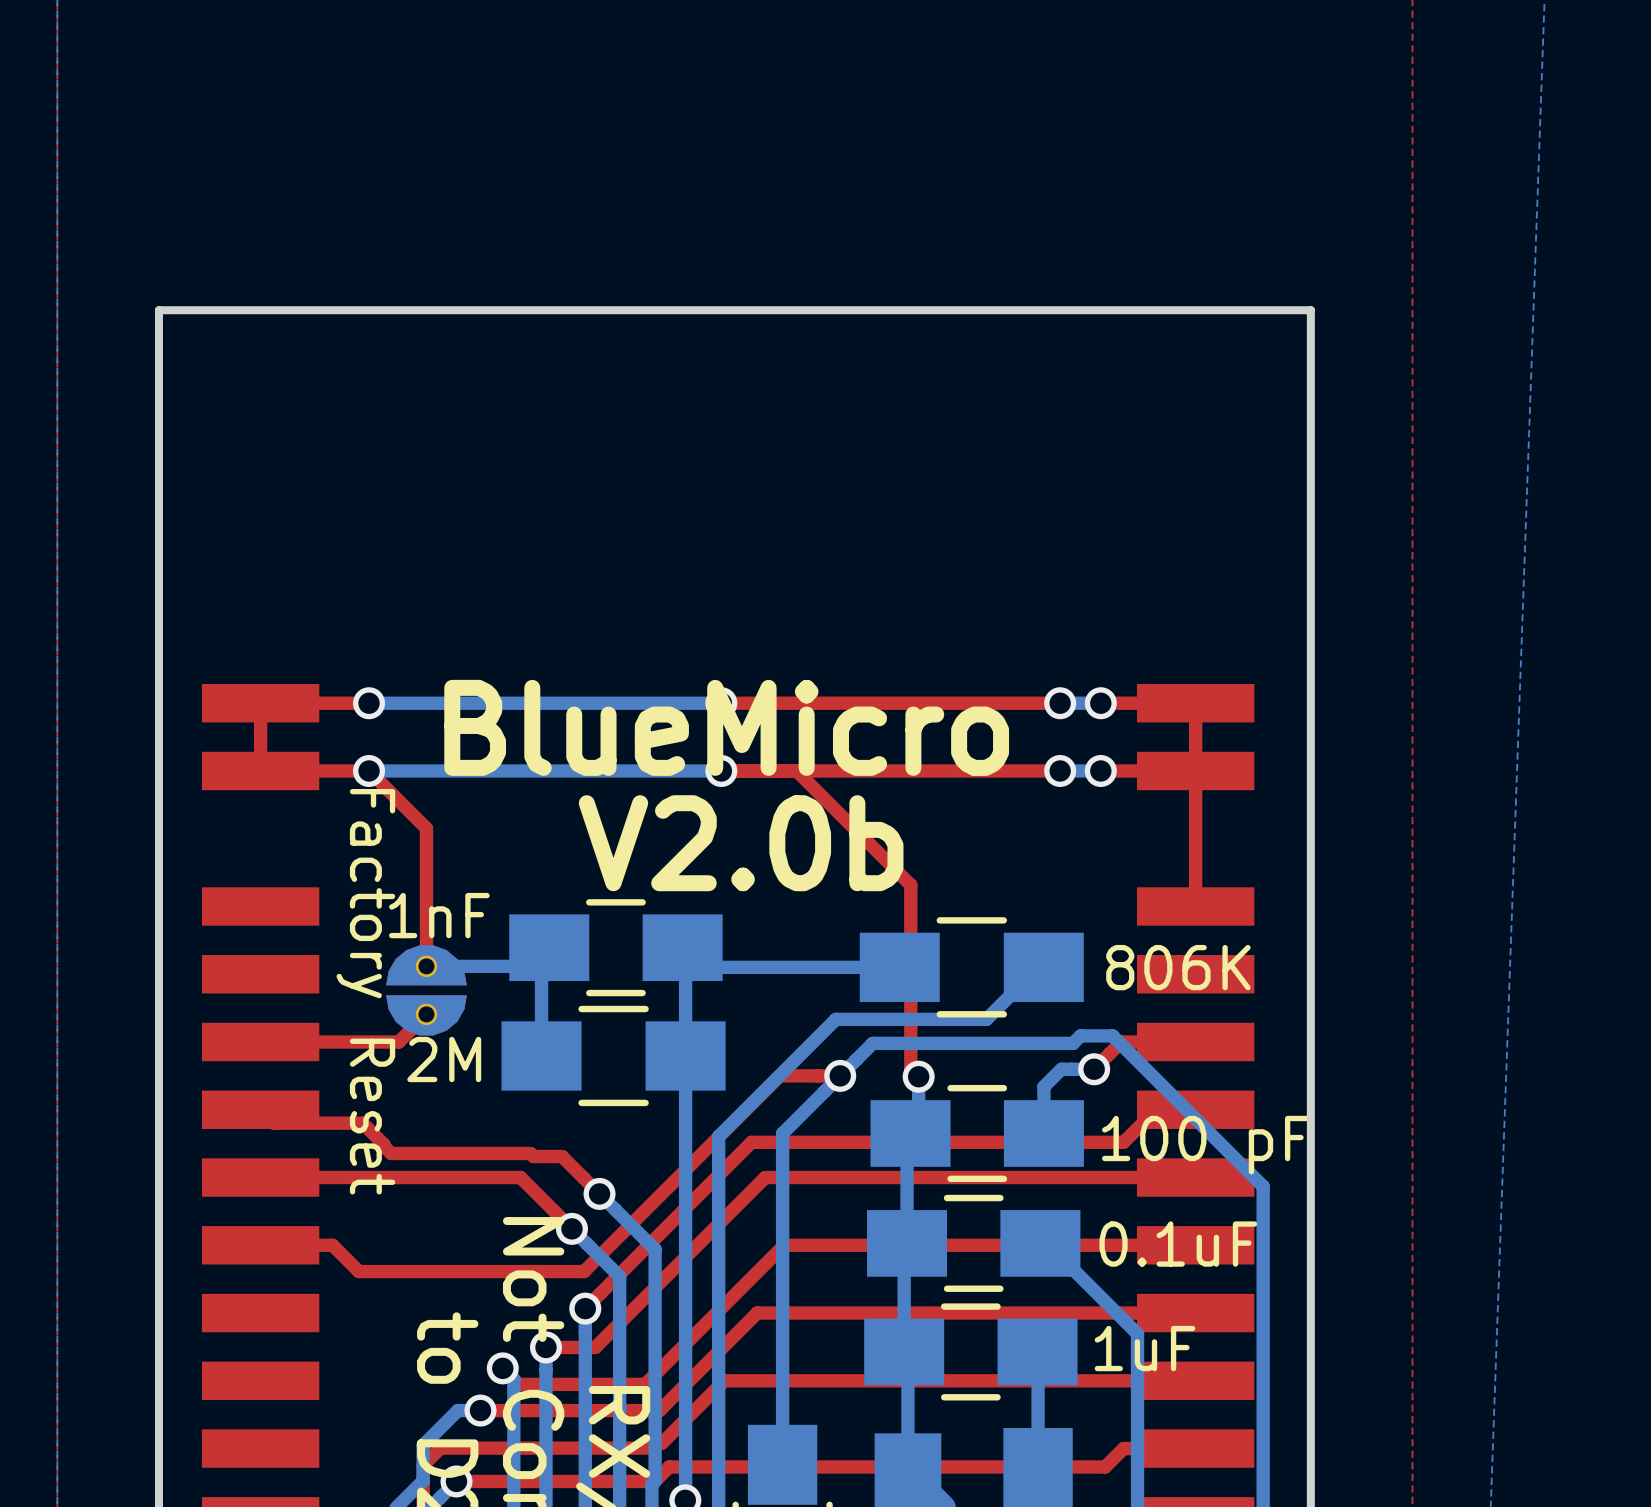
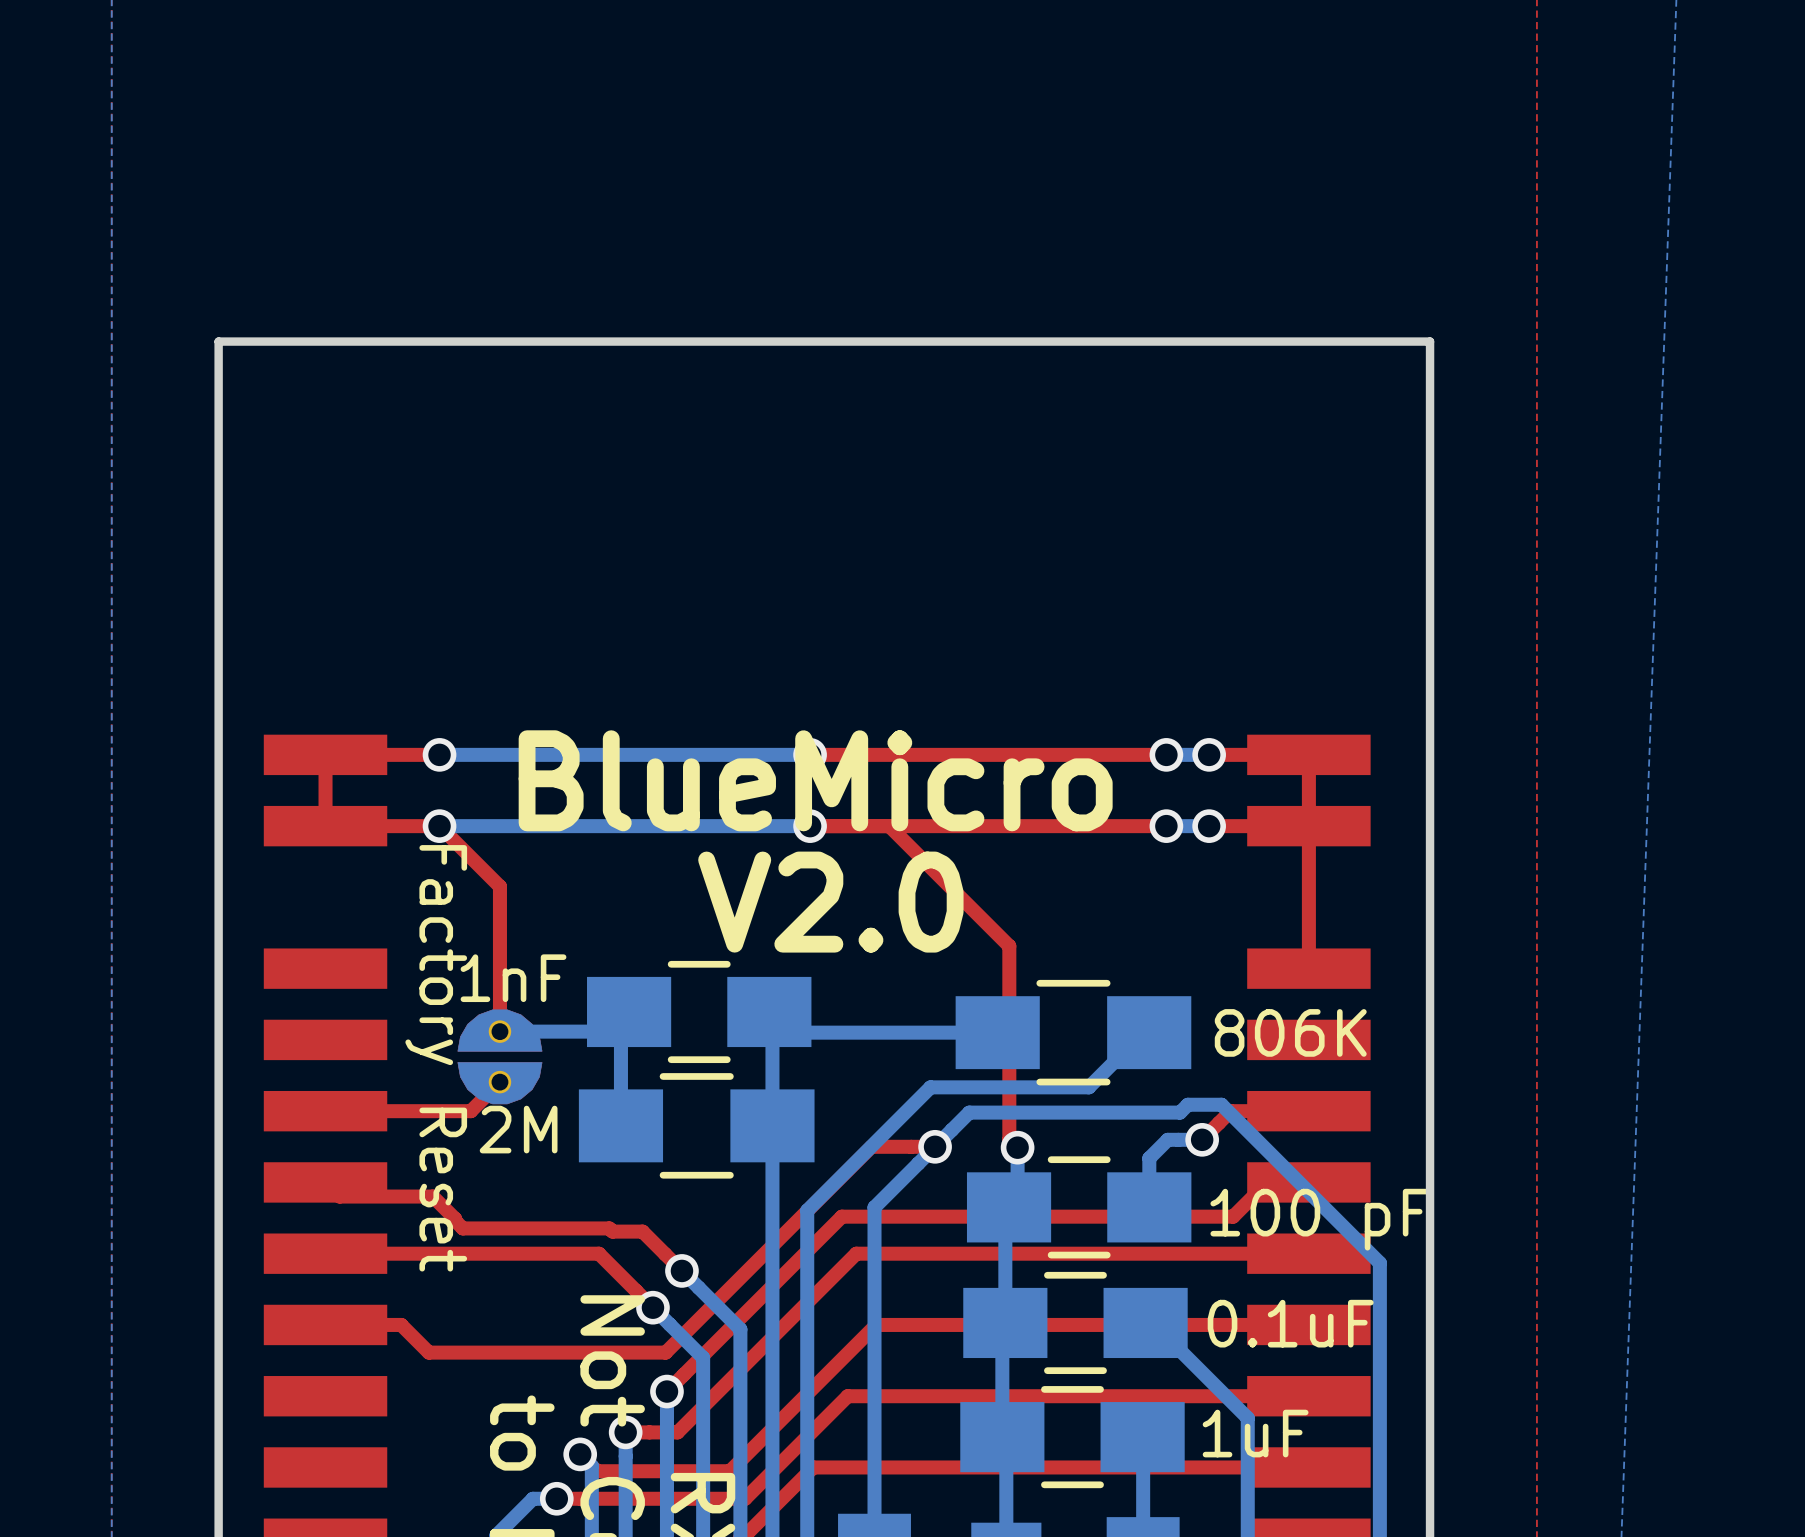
text: V2.0b (741, 843) -> V2.0 (830, 902)

